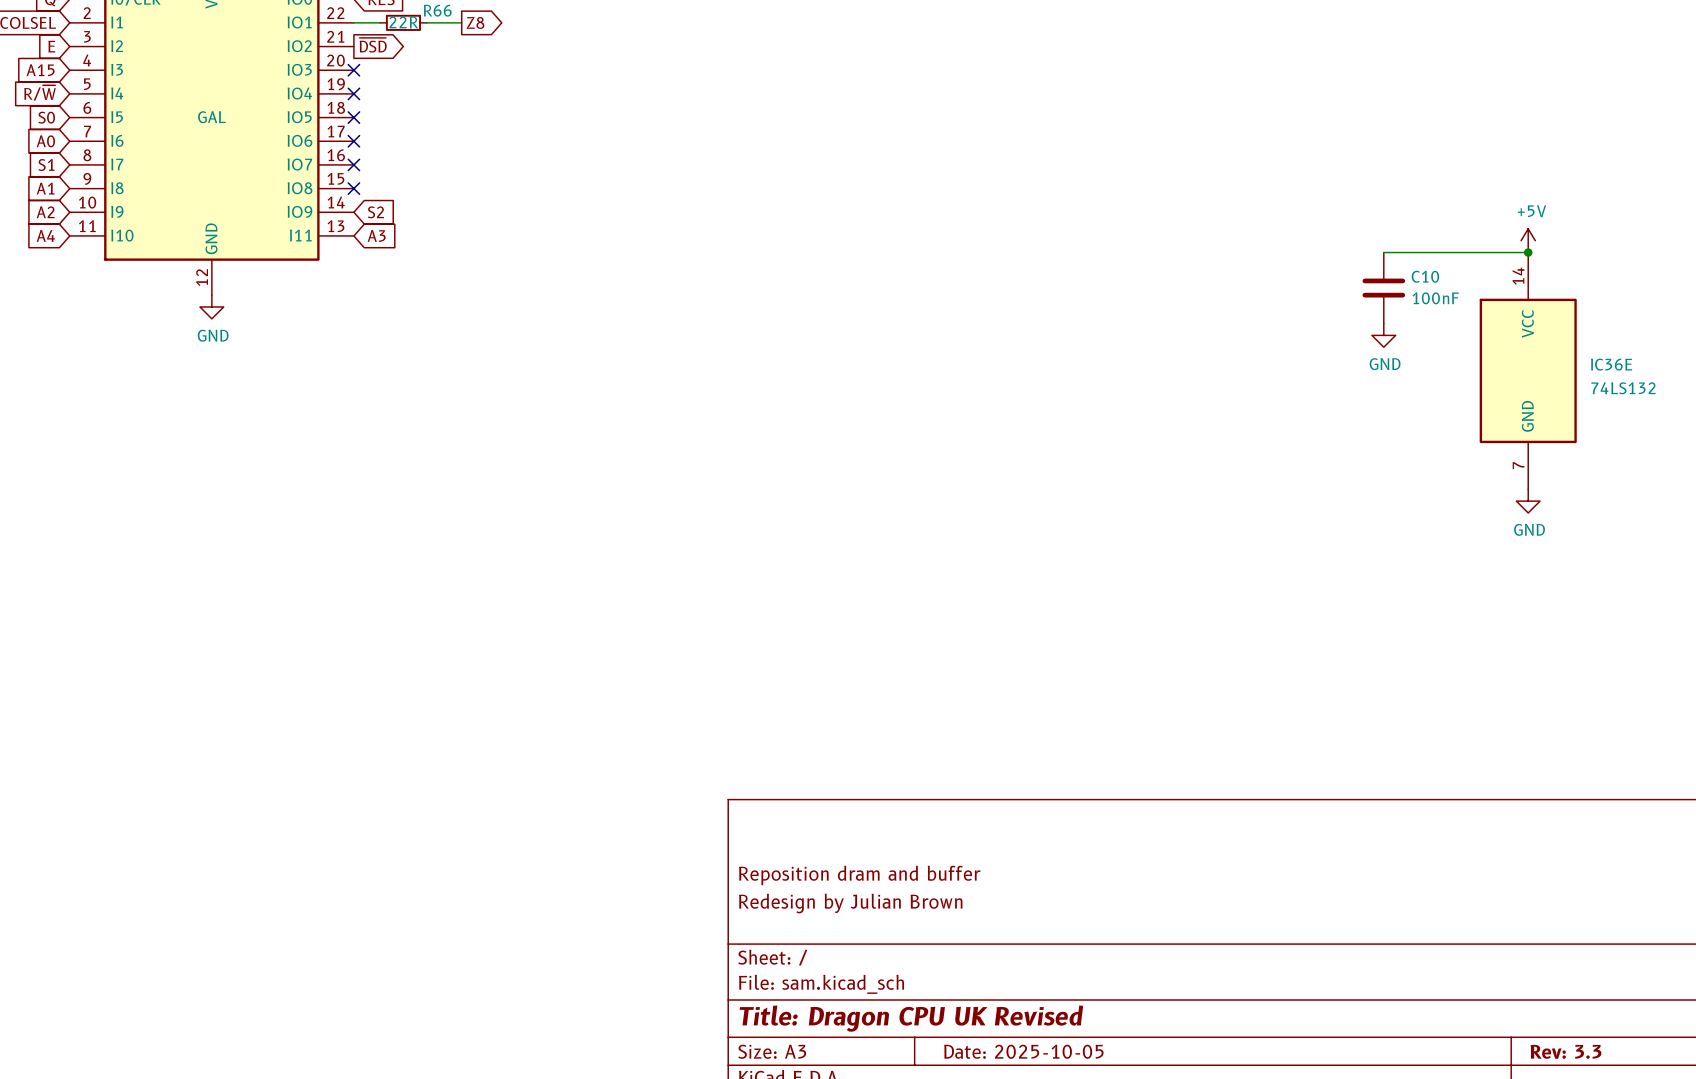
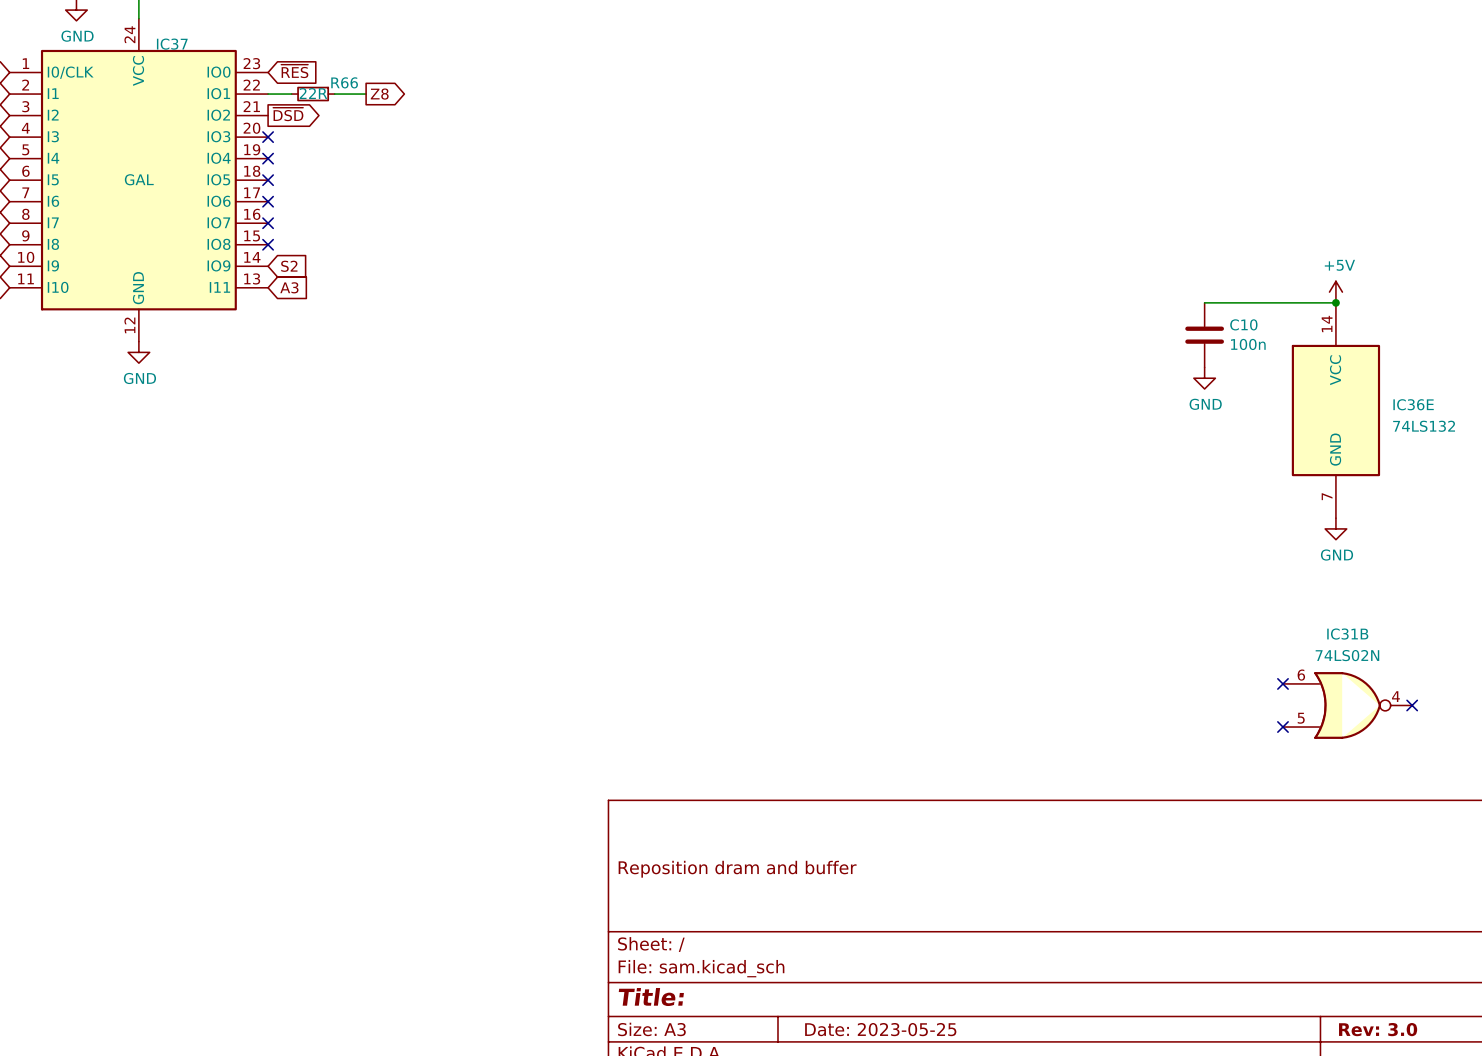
C10 value: 100nF (1435, 298) -> 100n (1248, 344)
no-connect mark: none -> (1282, 683)
IC31B: none -> 74LS02N (1347, 705)
no-connect mark: none -> (1412, 705)
no-connect mark: none -> (1282, 727)
title block: Redesign by Julian Brown (850, 903) -> none
title block: Title: Dragon CPU UK Revised (911, 1018) -> Title: (651, 997)
title block: Date: 2025-10-05 (1023, 1051) -> Date: 2023-05-25 (880, 1029)
title block: Rev: 3.3 (1566, 1051) -> Rev: 3.0 (1378, 1029)

